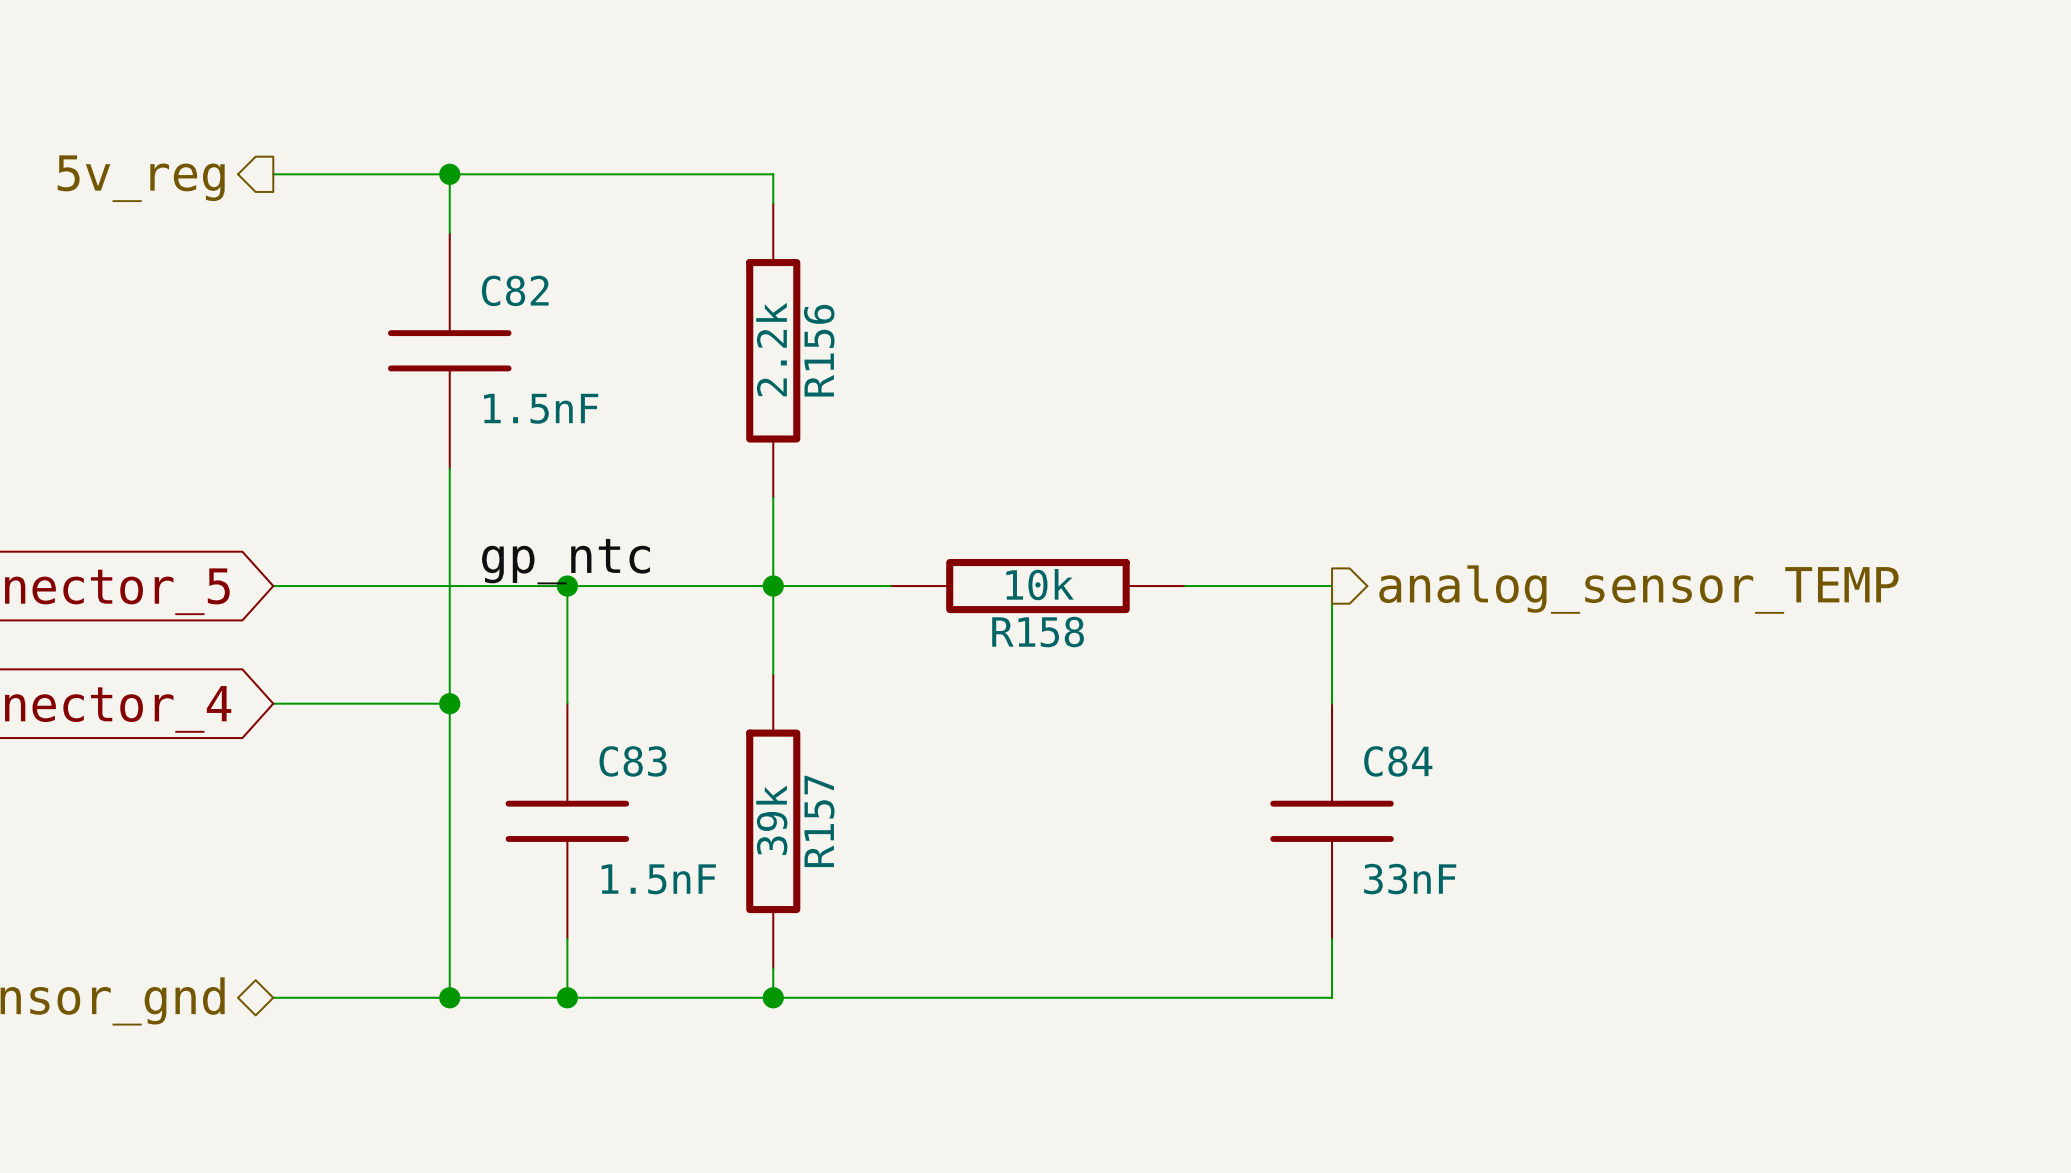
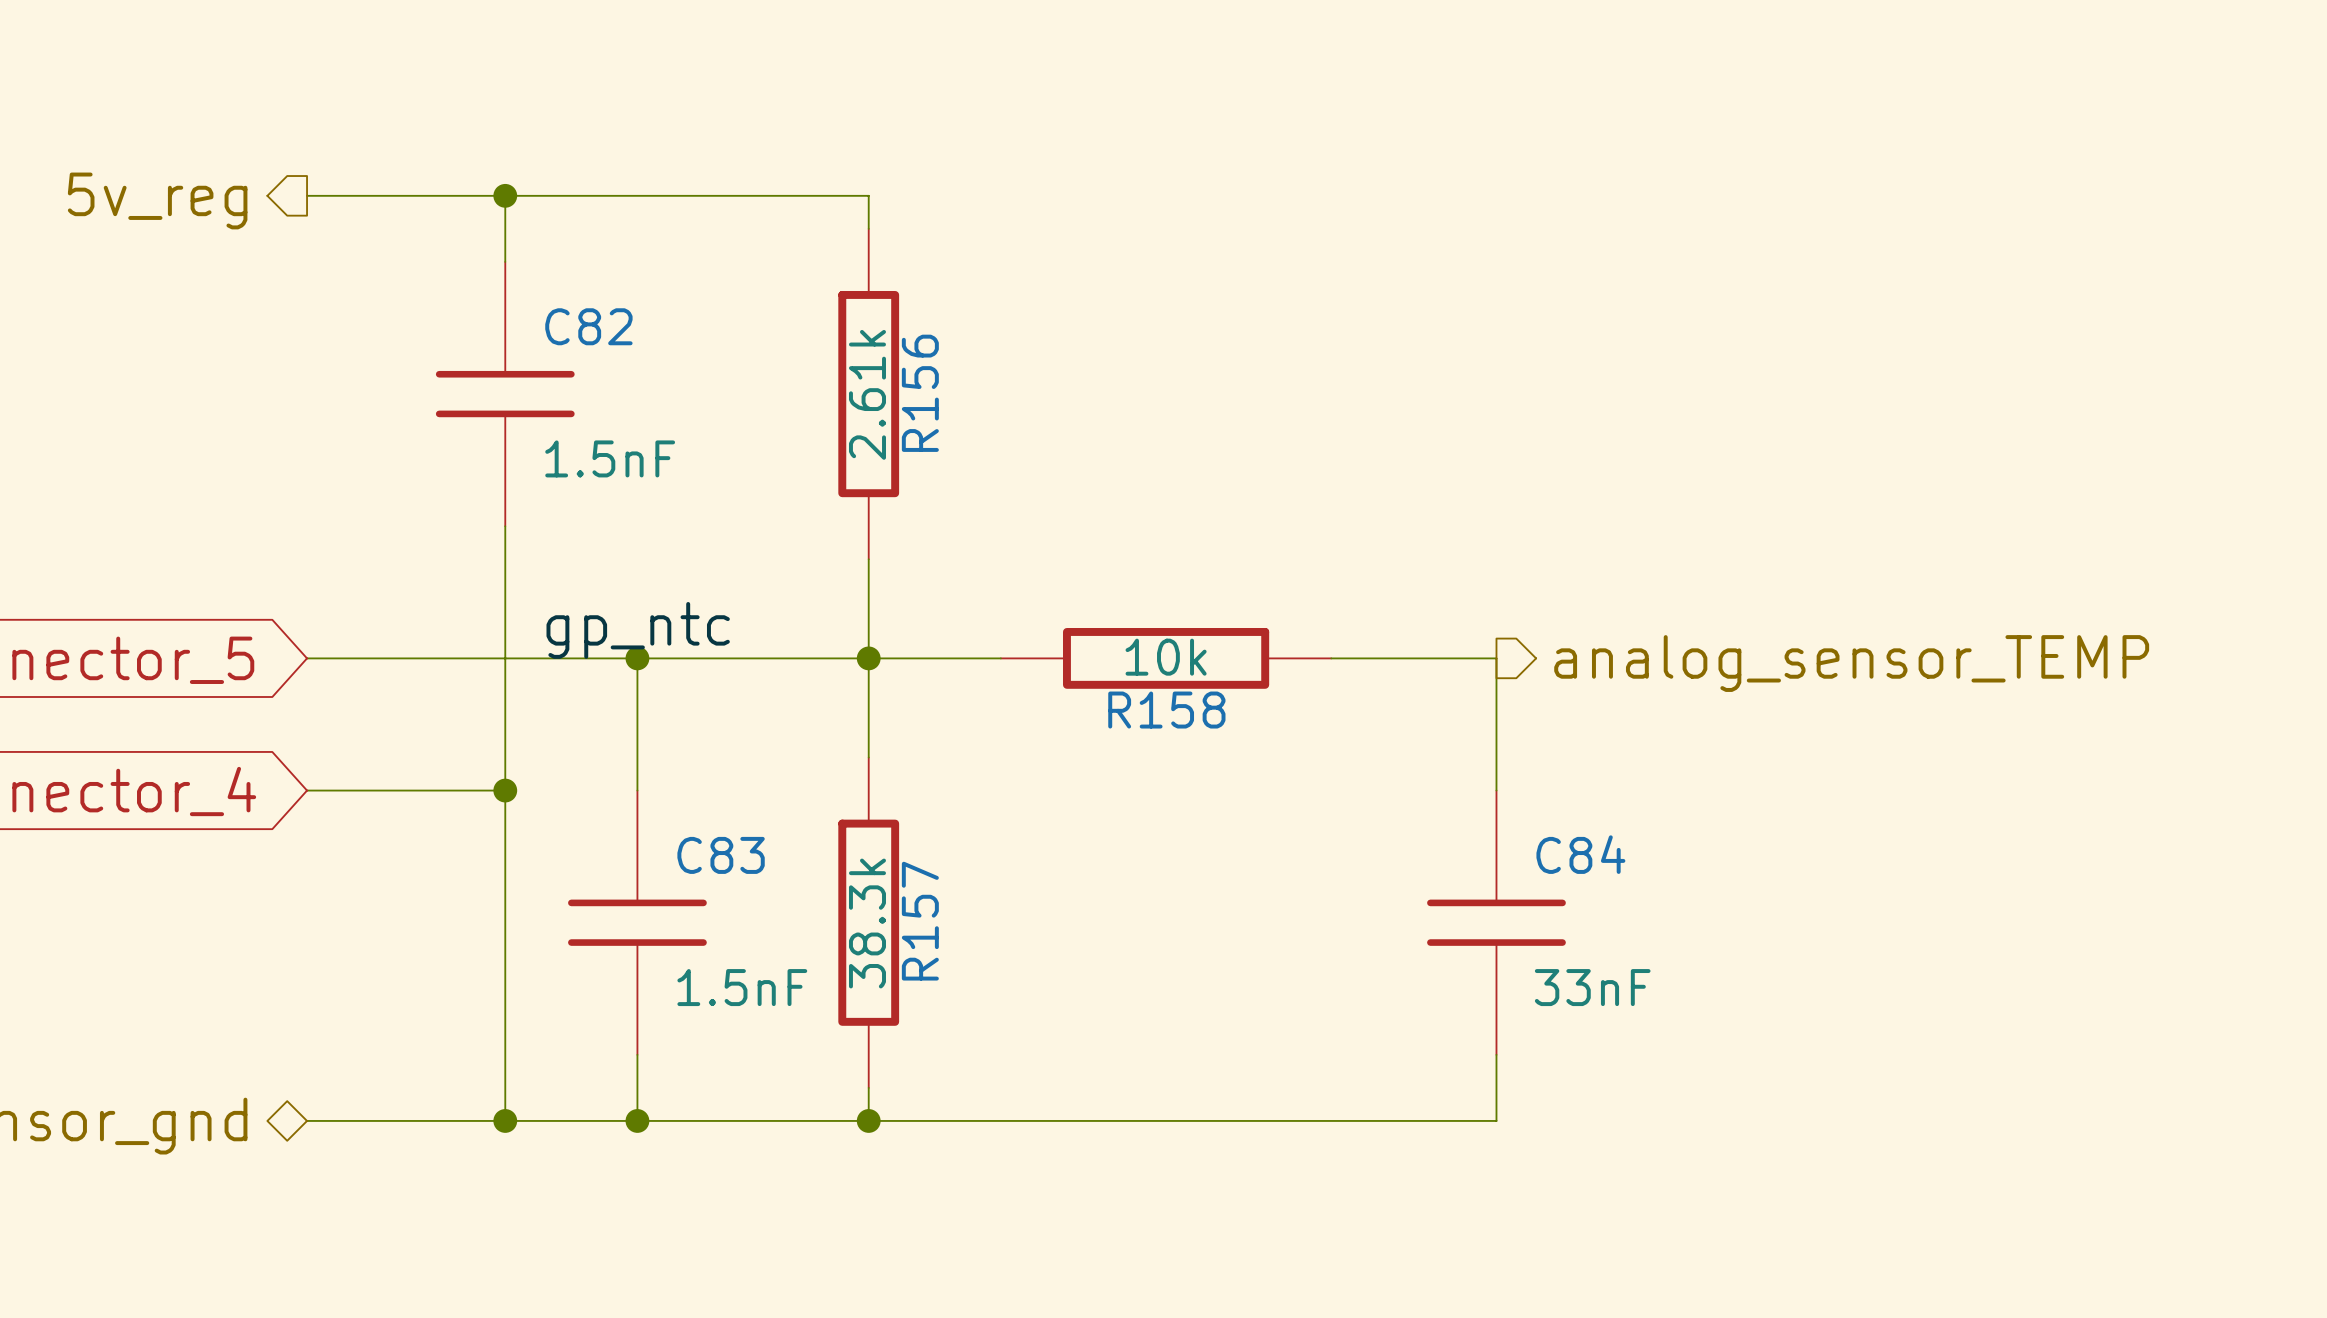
R156 value: 2.2k (771, 349) -> 2.61k (867, 394)
R157 value: 39k (771, 820) -> 38.3k (867, 923)

